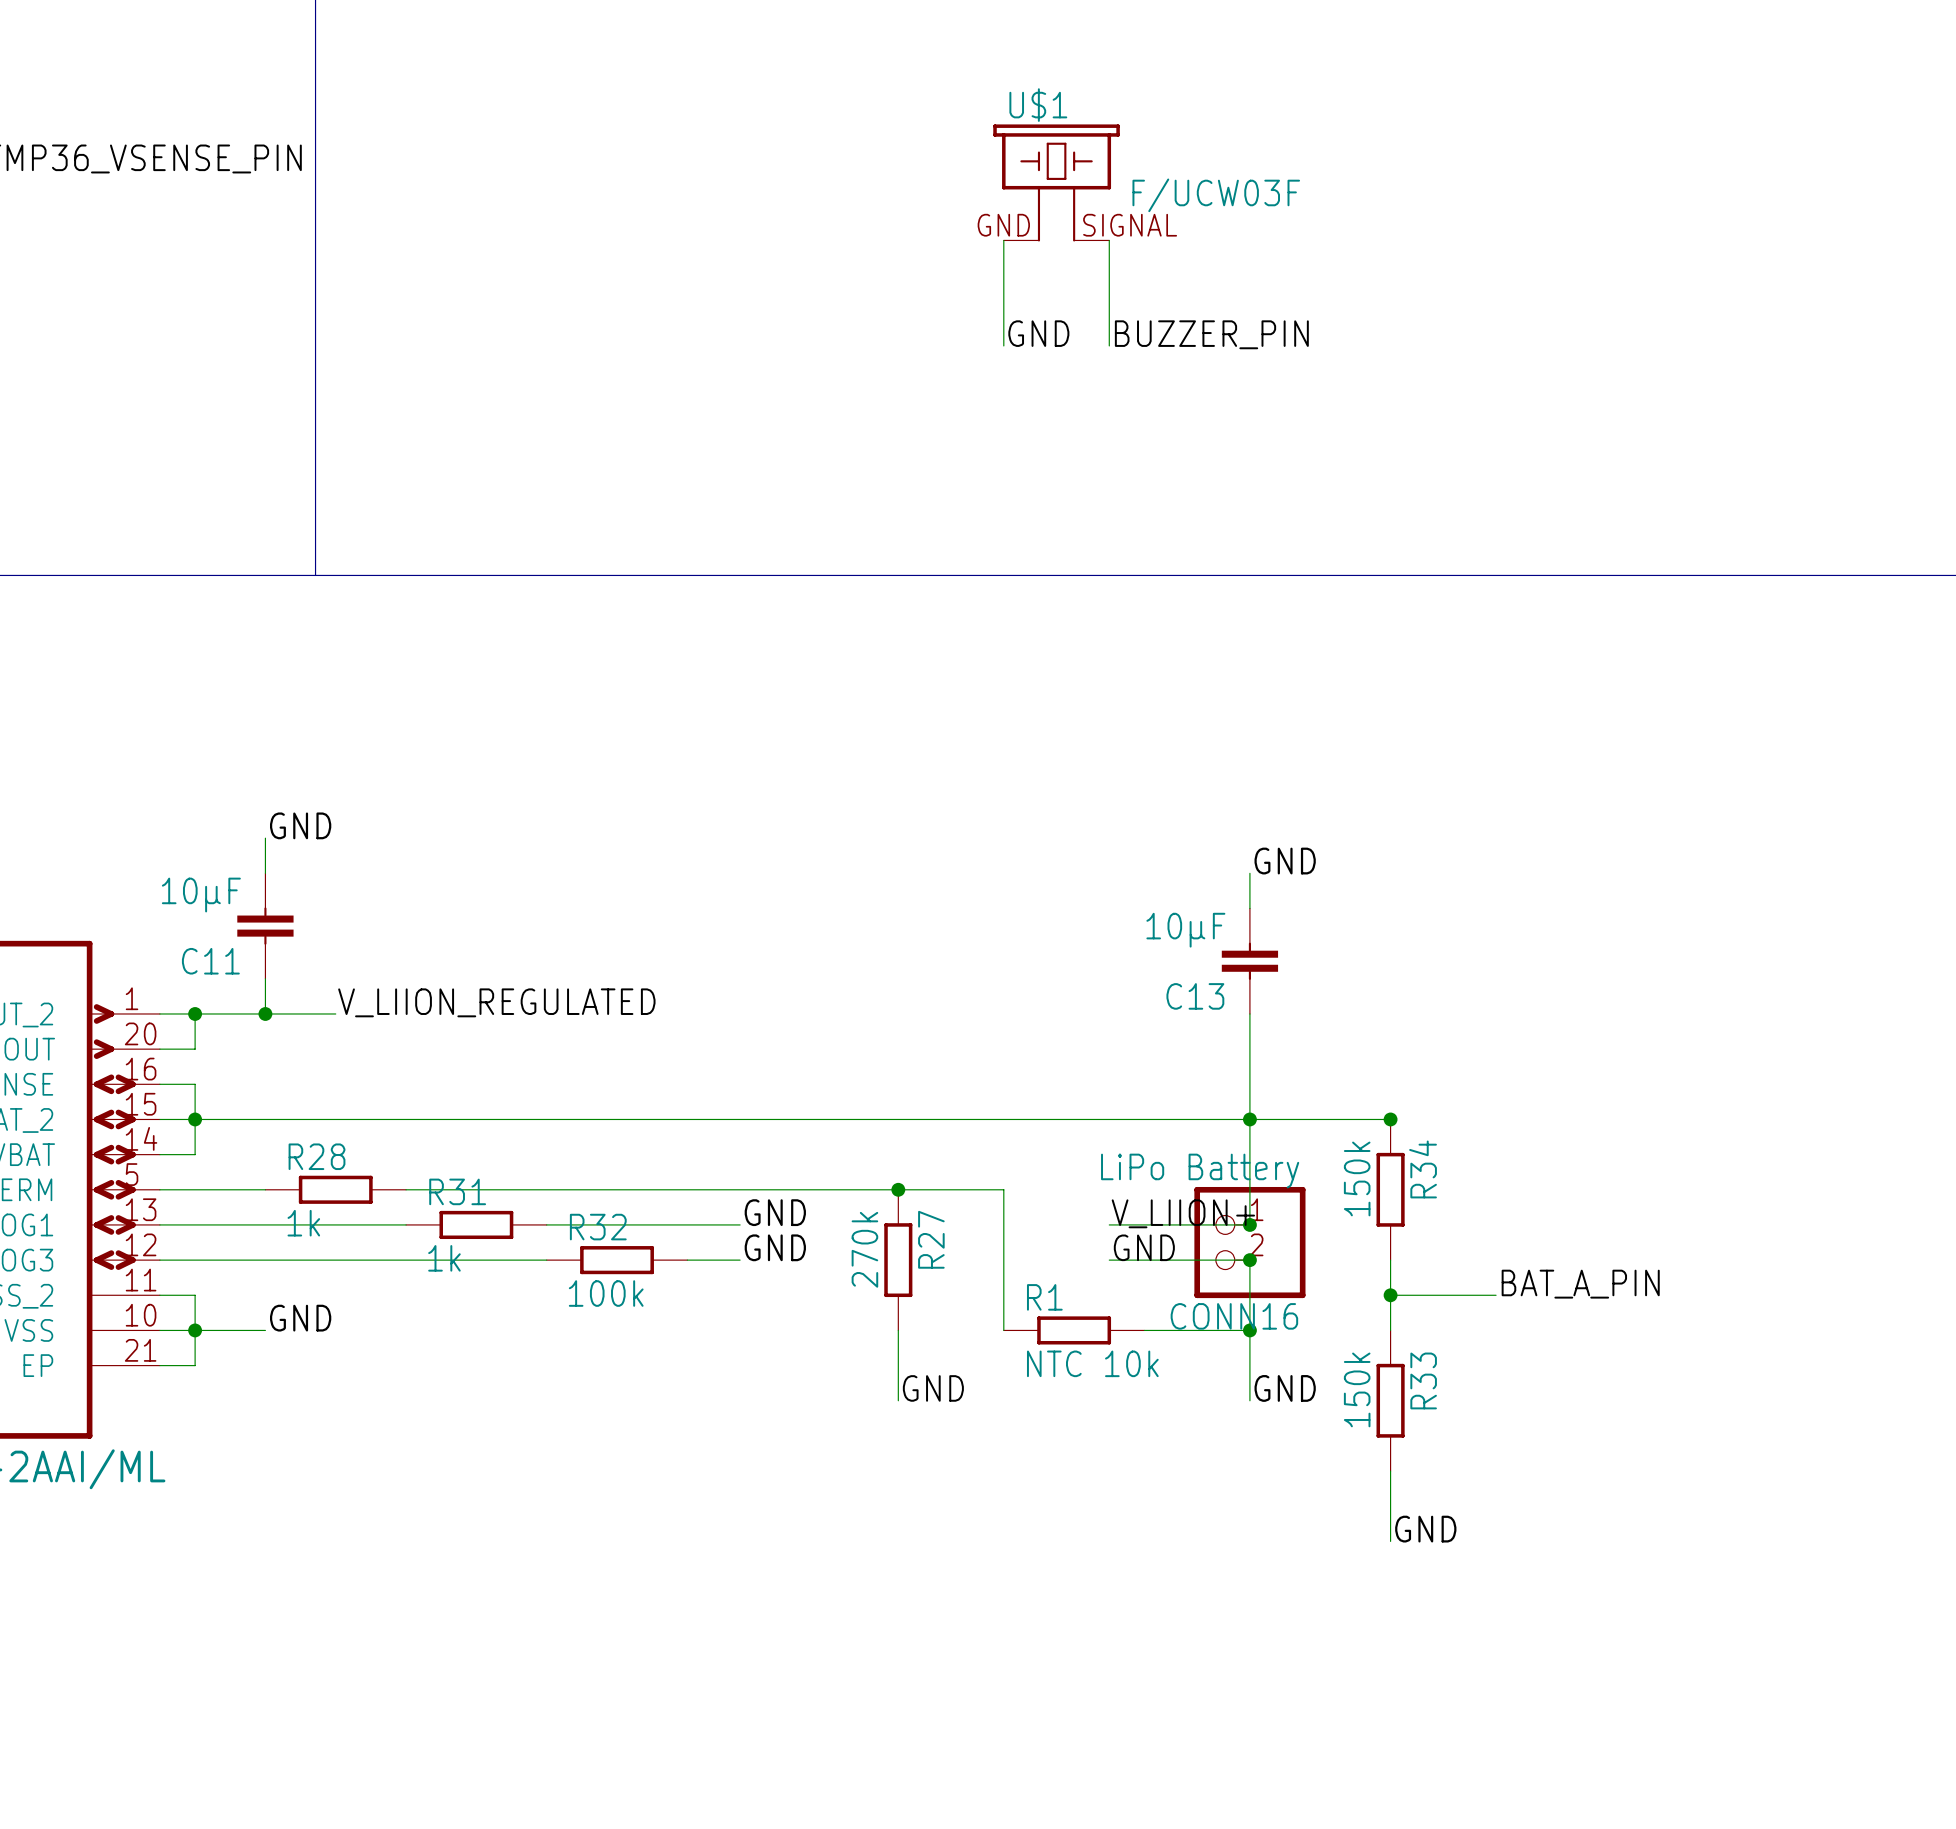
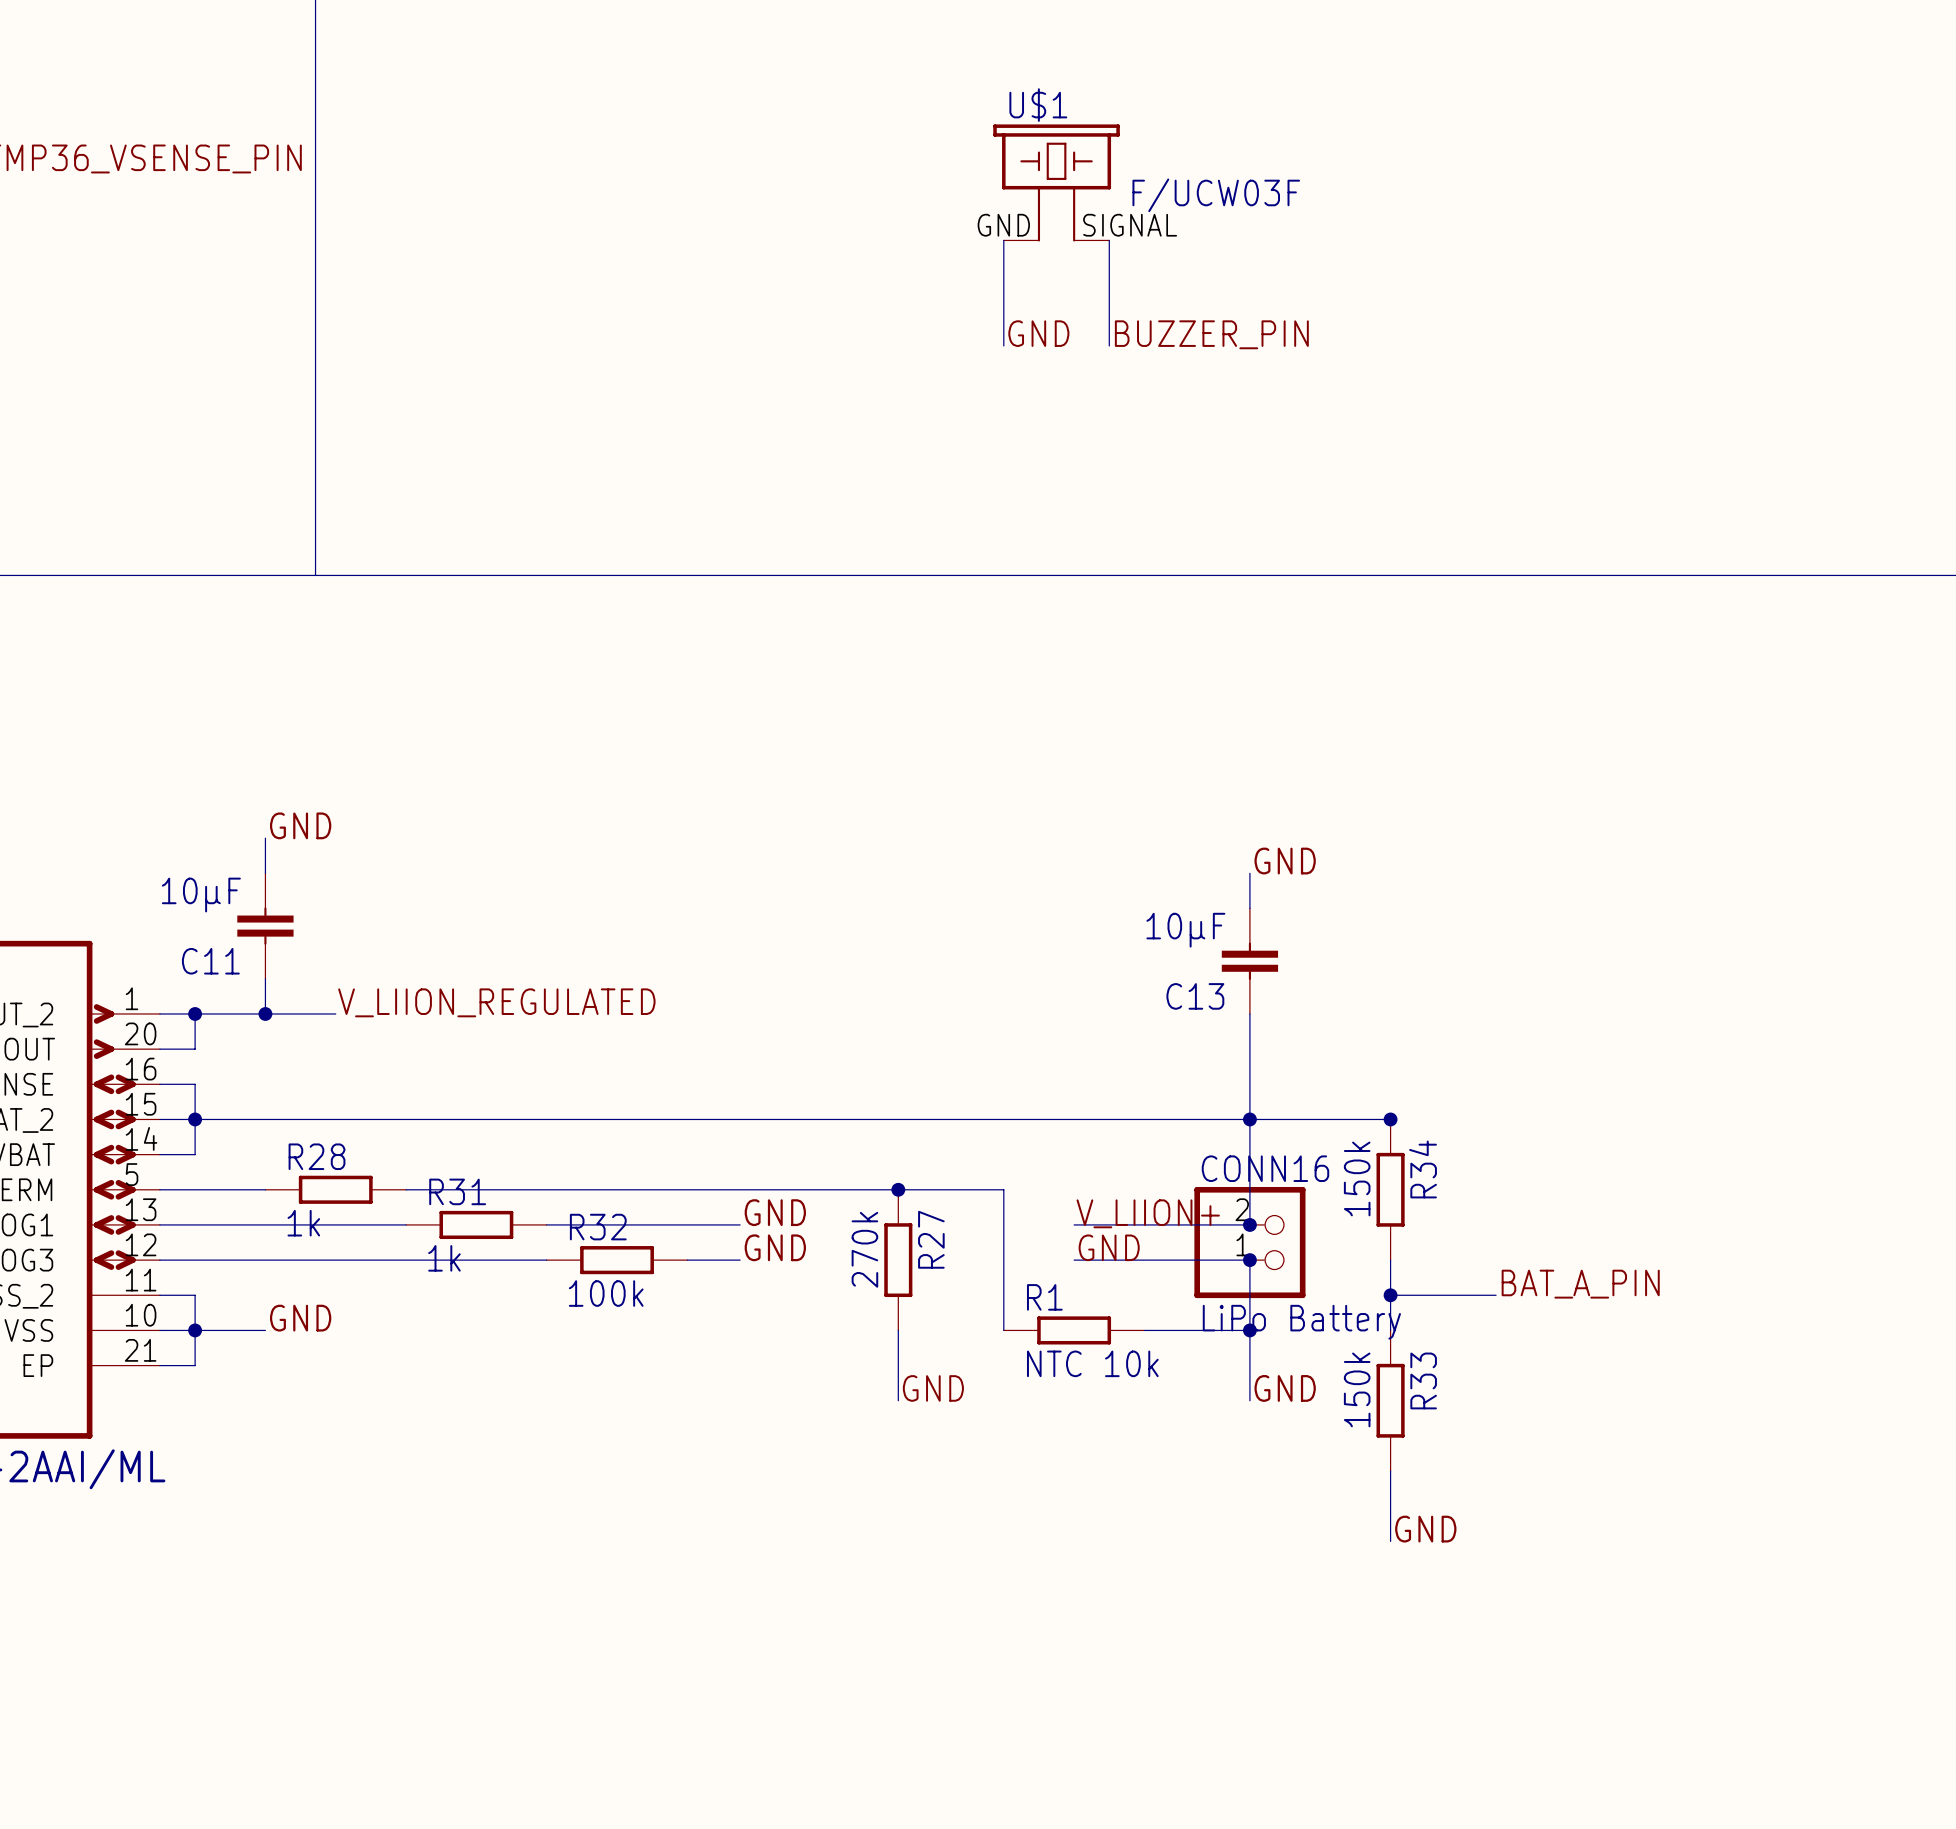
label position: V_LIION+ (1183, 1213) -> V_LIION+ (1148, 1213)
wire: none -> (1074, 1224) (1109, 1224)
CONN16 rotation: 0° (1249, 1242) -> 180° (1249, 1242)
label position: GND (1144, 1247) -> GND (1109, 1247)
wire: none -> (1074, 1260) (1109, 1260)

